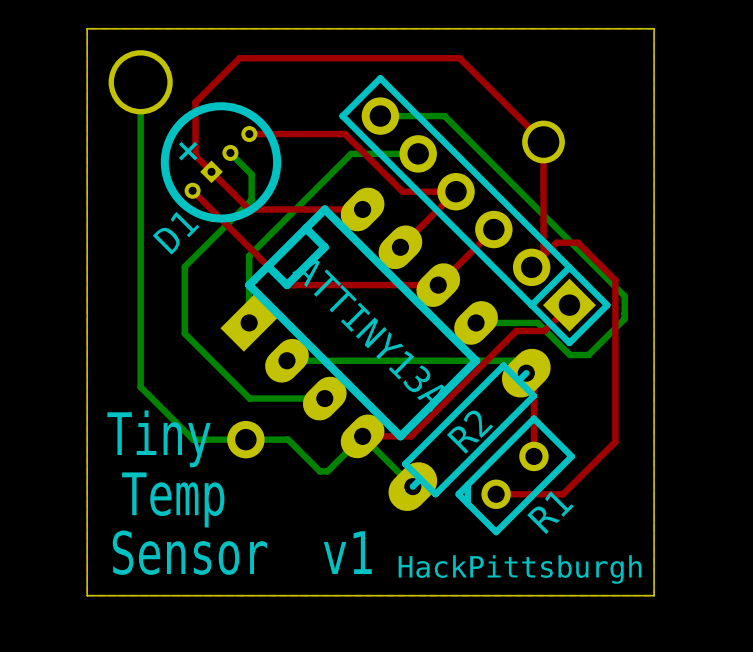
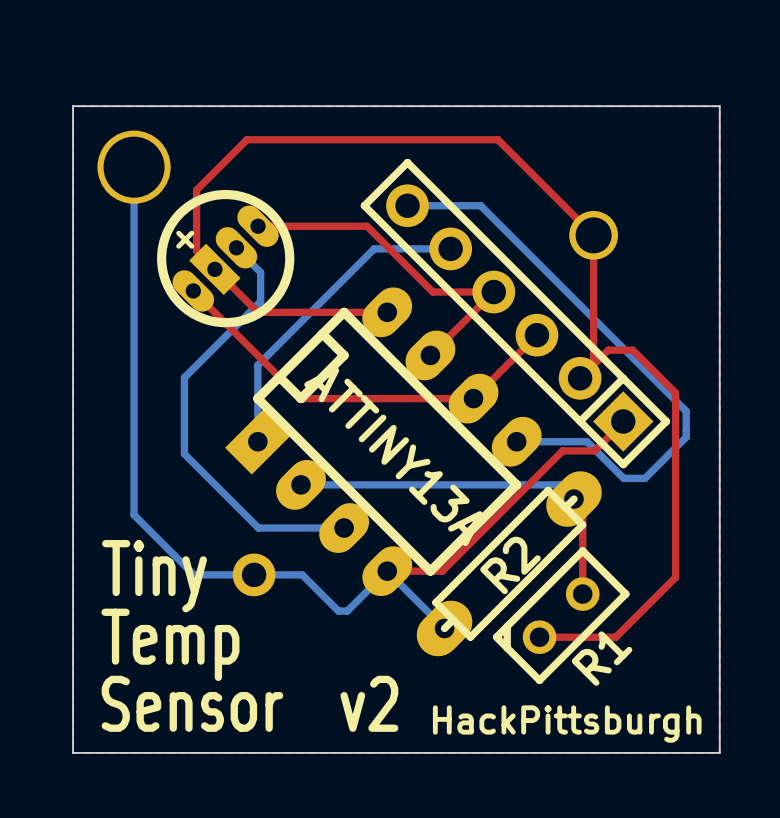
D1: (220, 162) -> none
part: none -> (225, 258)
text: Sensor v1 (242, 552) -> Sensor v2 (249, 703)

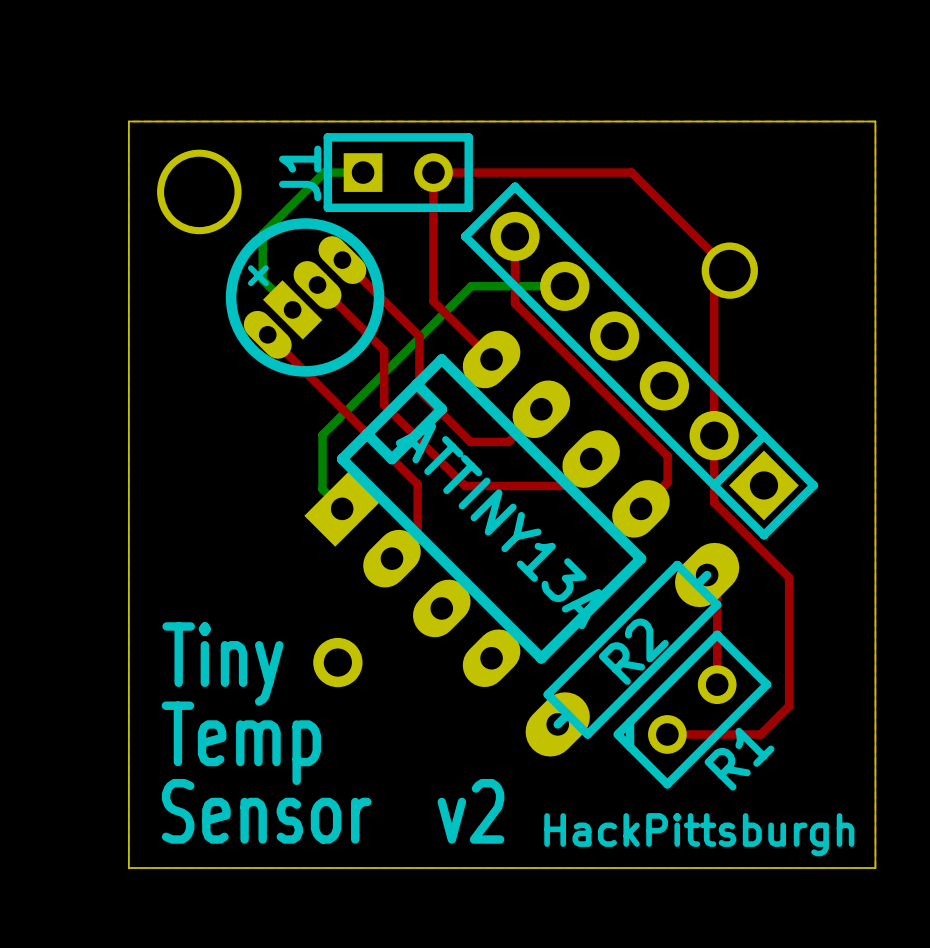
bottom track: none -> (363, 172) (324, 172) (262, 234) (262, 279) (292, 309)
J1: none -> (398, 172)
top track: (508, 150) (497, 139) (246, 139) (196, 190) (196, 251) (257, 312) (387, 312) -> (631, 172) (433, 172) (433, 301) (491, 359)
bottom track: (134, 167) (134, 514) (193, 574) (302, 574) (338, 611) (347, 611) (387, 571) (444, 628) -> none
bottom track: (407, 205) (480, 205) (686, 411) (686, 437) (645, 478) (623, 478) (587, 441) (516, 441) -> none
top track: none -> (514, 236) (514, 303) (667, 456) (667, 482) (640, 508)
top track: (258, 226) (367, 226) (432, 292) (493, 292) (430, 355) -> (343, 260) (419, 336) (419, 390) (470, 441) (508, 441) (541, 409)
top track: (593, 235) (593, 364) -> none
bottom track: (236, 247) (260, 272) (260, 301) (184, 377) (184, 453) (258, 528) (344, 528) -> none
top track: none -> (317, 284) (384, 350) (384, 404) (465, 485) (564, 485) (591, 459)
bottom track: (374, 248) (257, 365) (257, 441) -> (476, 286) (471, 286) (322, 434) (322, 489) (342, 508)
top track: (193, 290) (300, 398) (473, 398) (536, 335) -> (267, 334) (417, 484) (417, 533) (391, 558)
top track: (580, 378) (608, 350) (632, 350) (675, 392) (675, 577) (615, 637) -> (729, 270) (714, 286) (714, 502) (789, 577) (789, 706) (760, 734) (755, 734)
top track: (623, 421) (594, 450) (562, 450) (442, 571) (387, 571) -> none
bottom track: (300, 484) (559, 484) (574, 499) -> none

